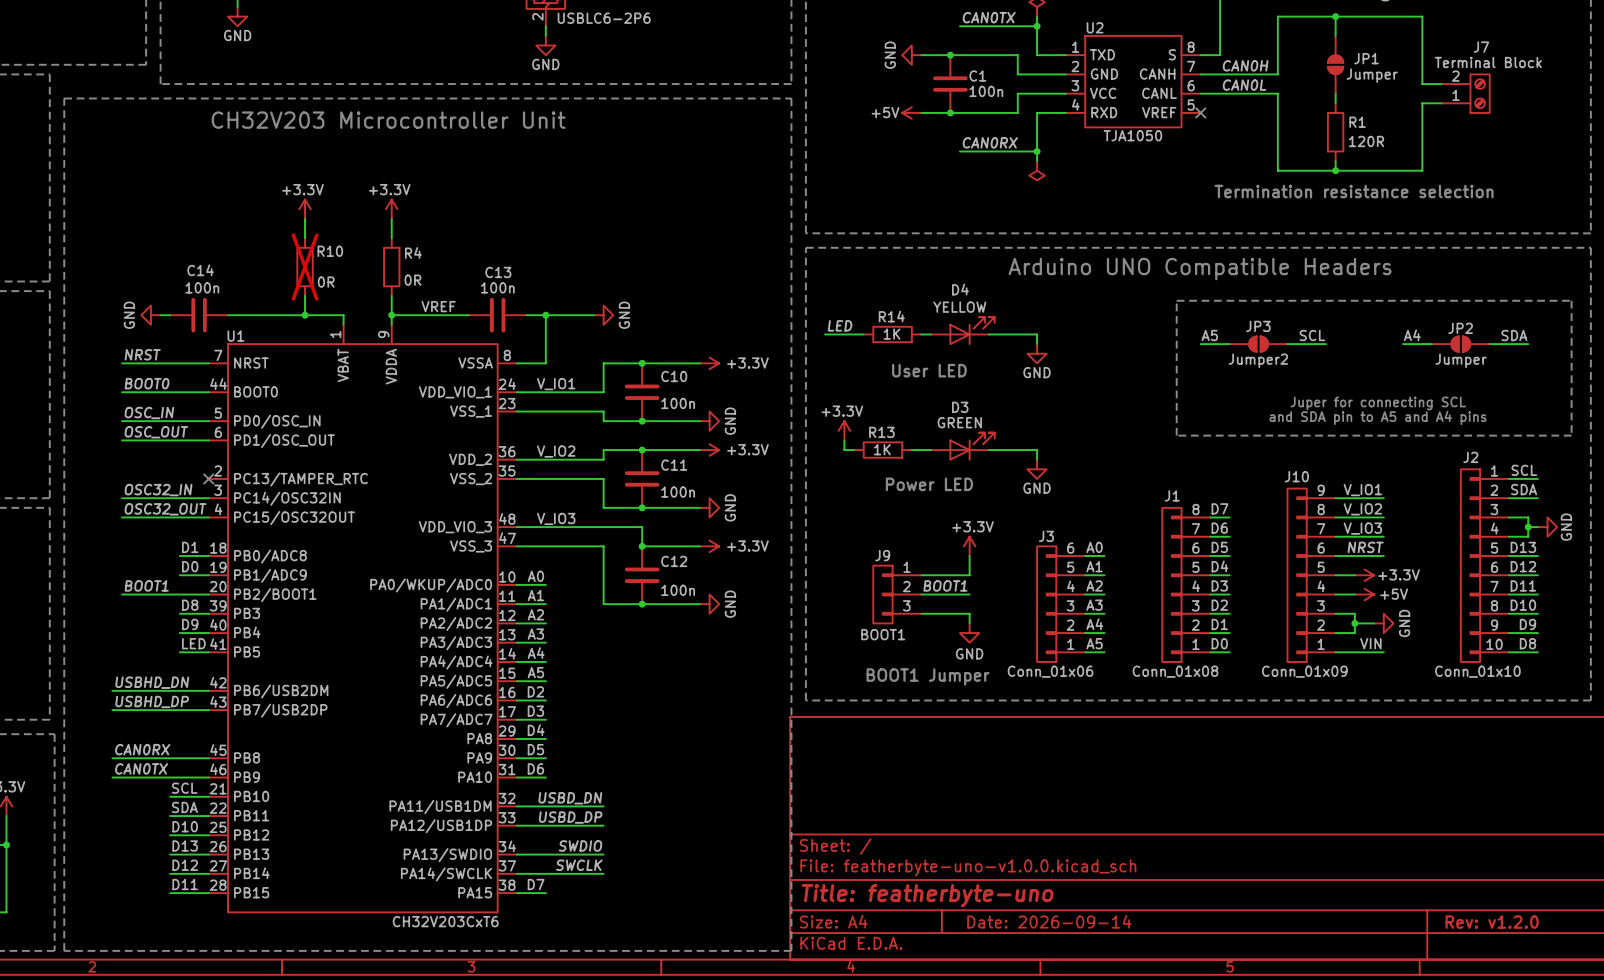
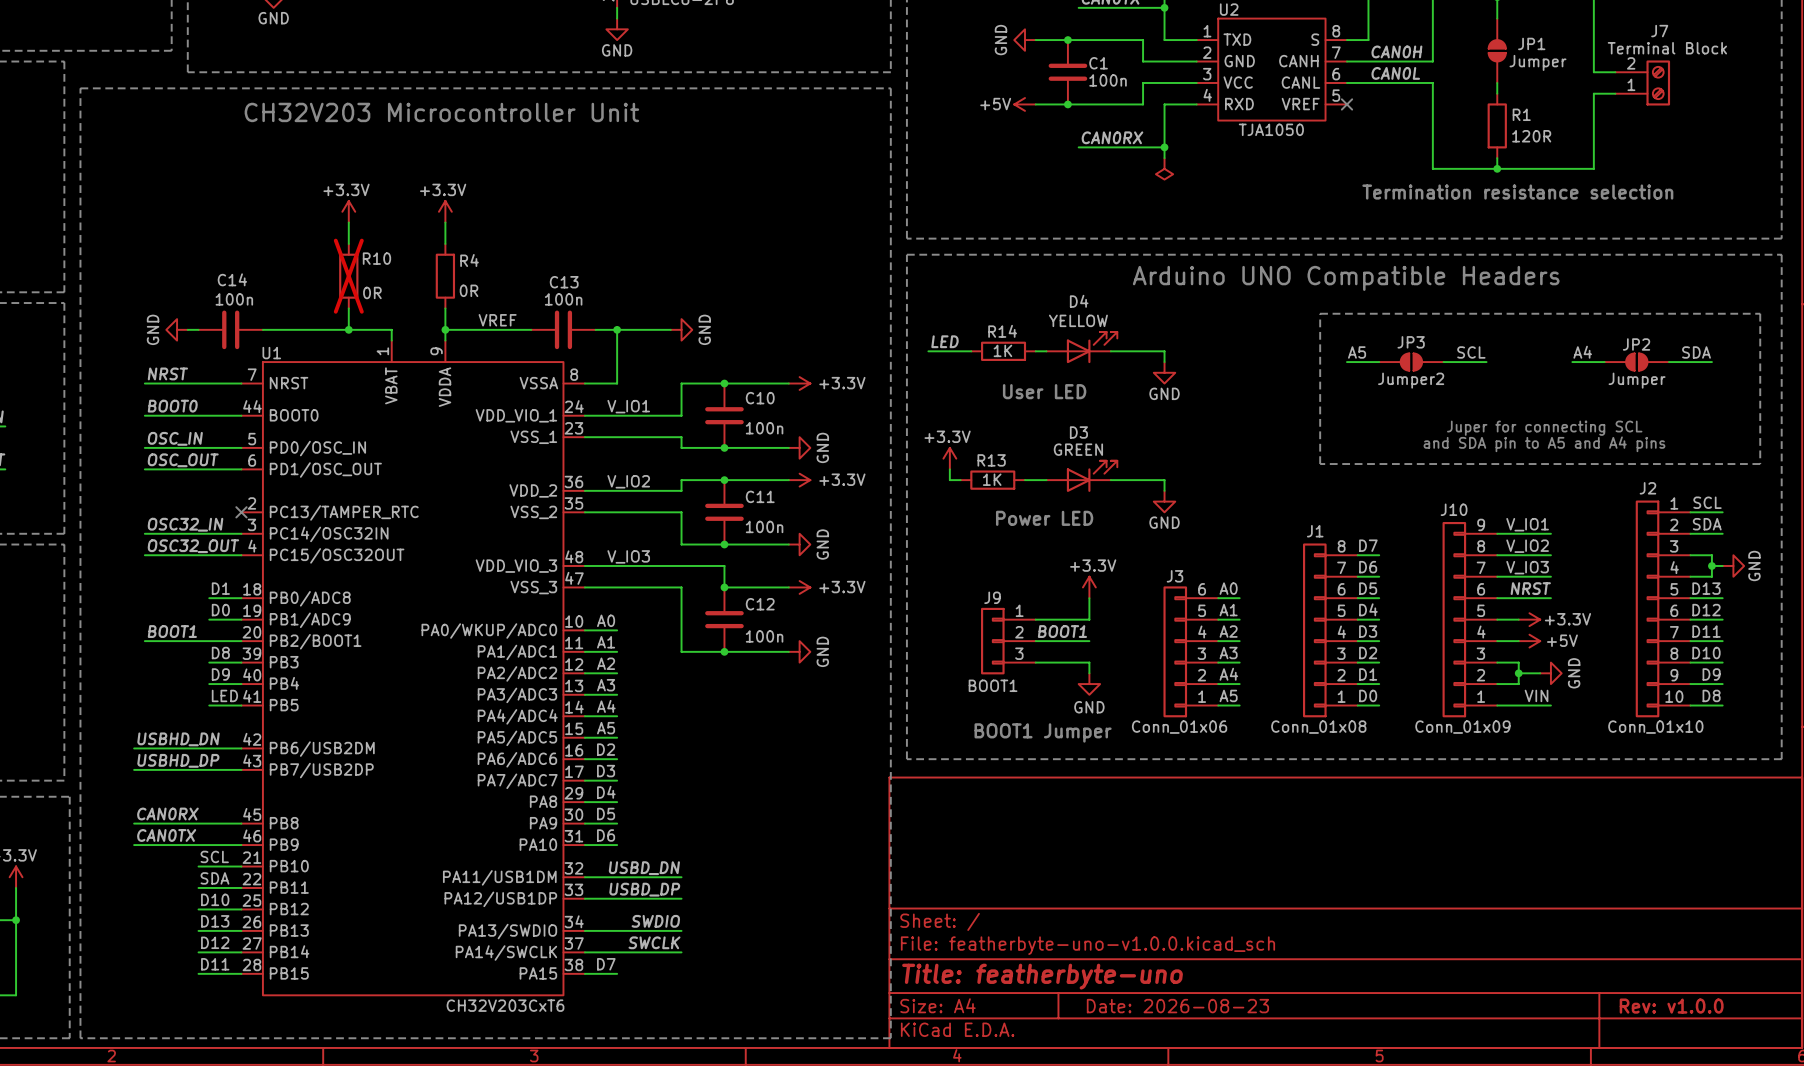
title block: Date: 2026-09-14 (1049, 921) -> Date: 2026-08-23 (1177, 1006)
title block: Rev: v1.2.0 (1492, 922) -> Rev: v1.0.0 (1671, 1006)

